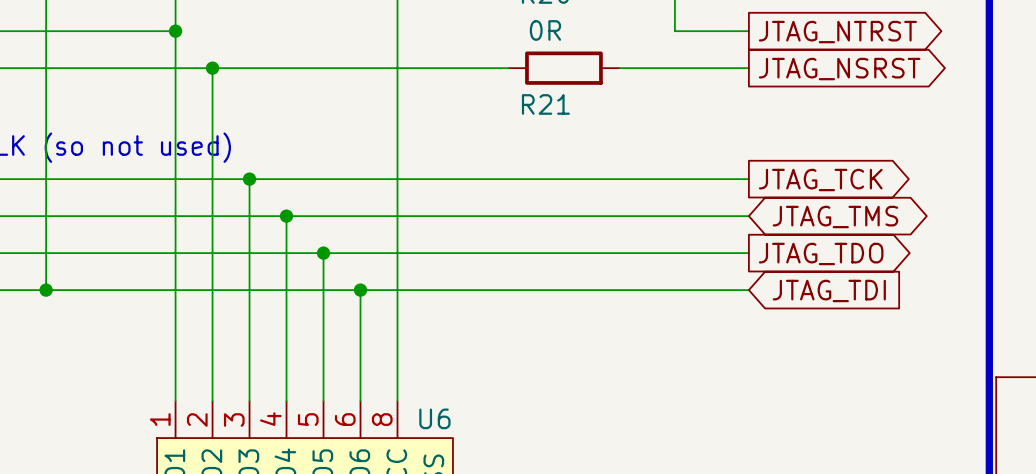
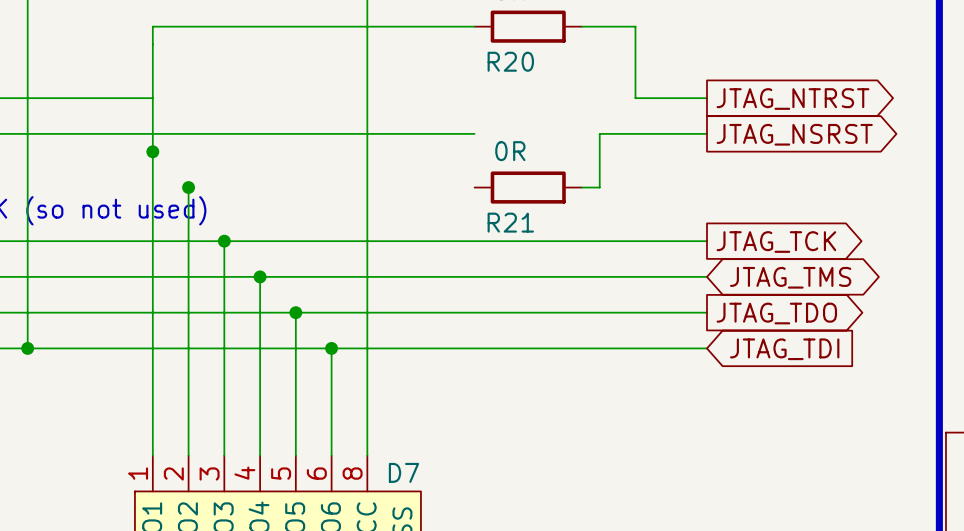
junction: (175, 31) -> none
wire: (212, 68) (212, 123) -> none
junction: (212, 68) -> none
R21 position: (563, 68) -> (528, 187)
wire: (619, 68) (637, 68) -> (581, 187) (599, 187) (599, 133)
junction: none -> (152, 151)
junction: none -> (188, 187)
U6 name: U6 (434, 418) -> D7 (403, 472)

